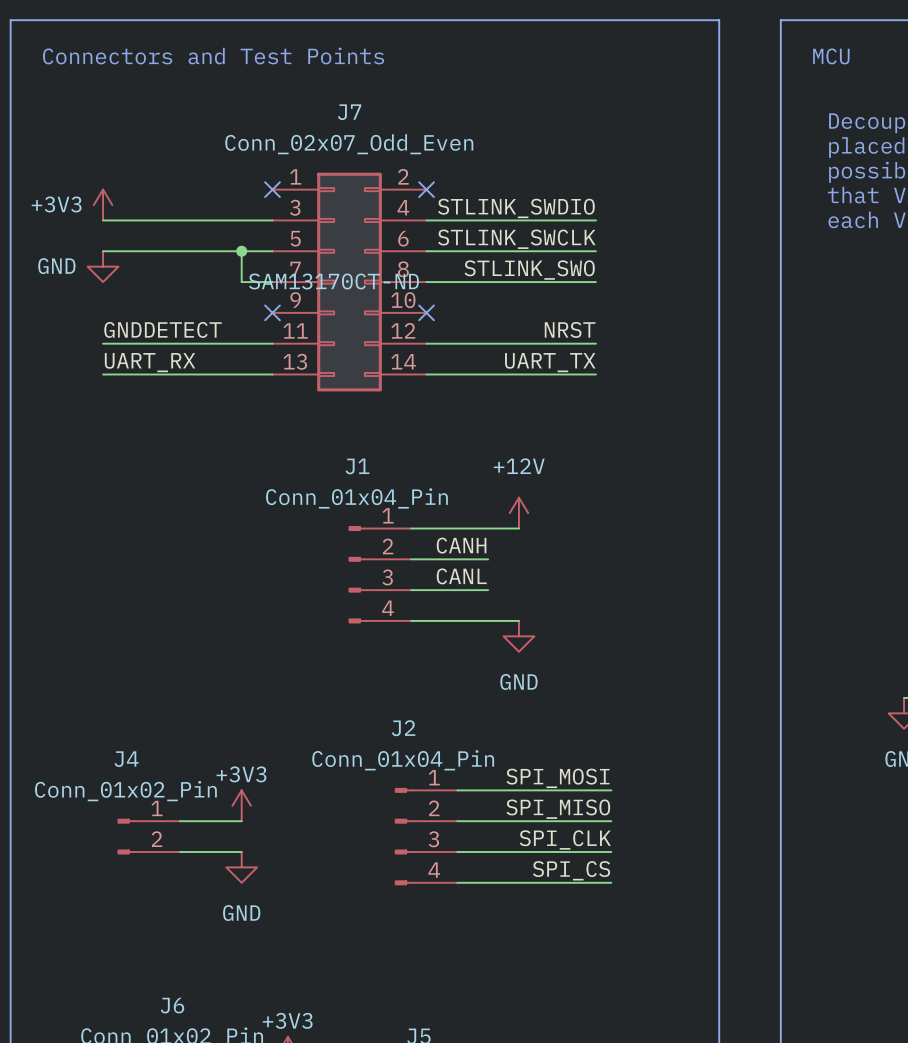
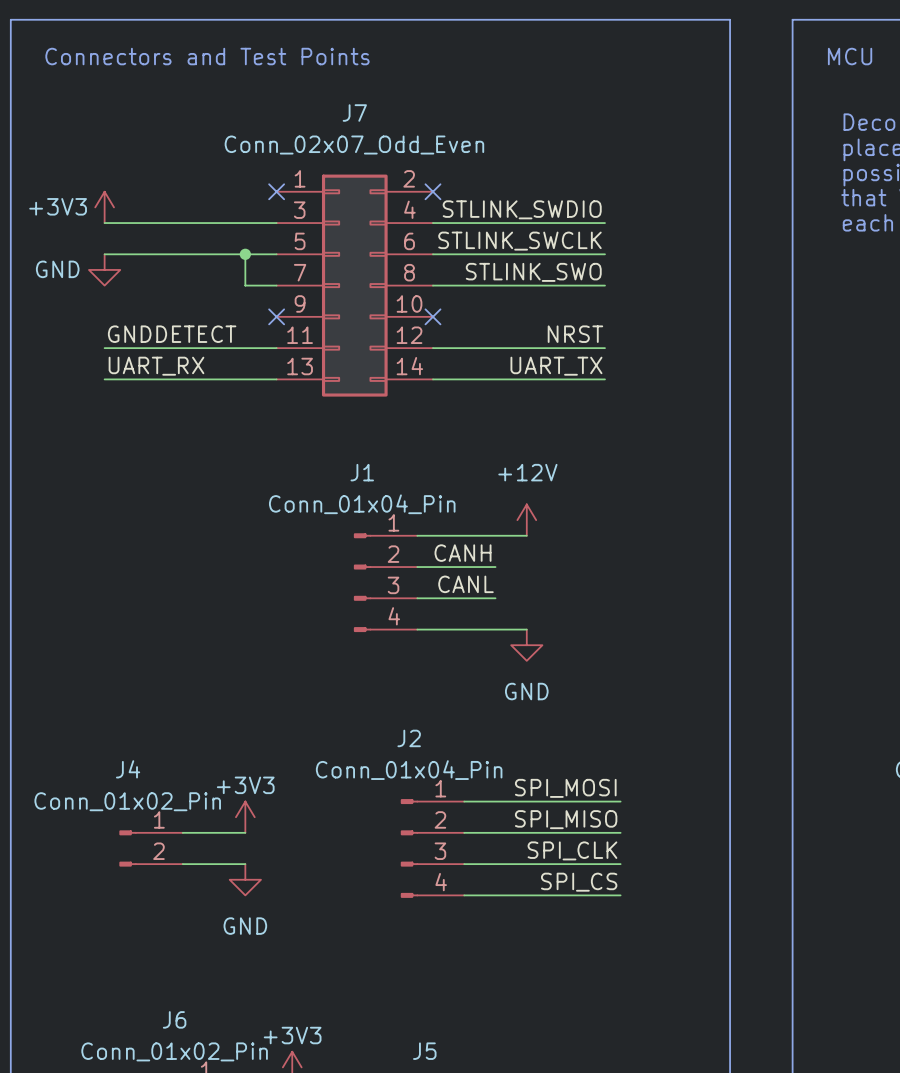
J7 text: SAM13170CT-ND (334, 281) -> none

